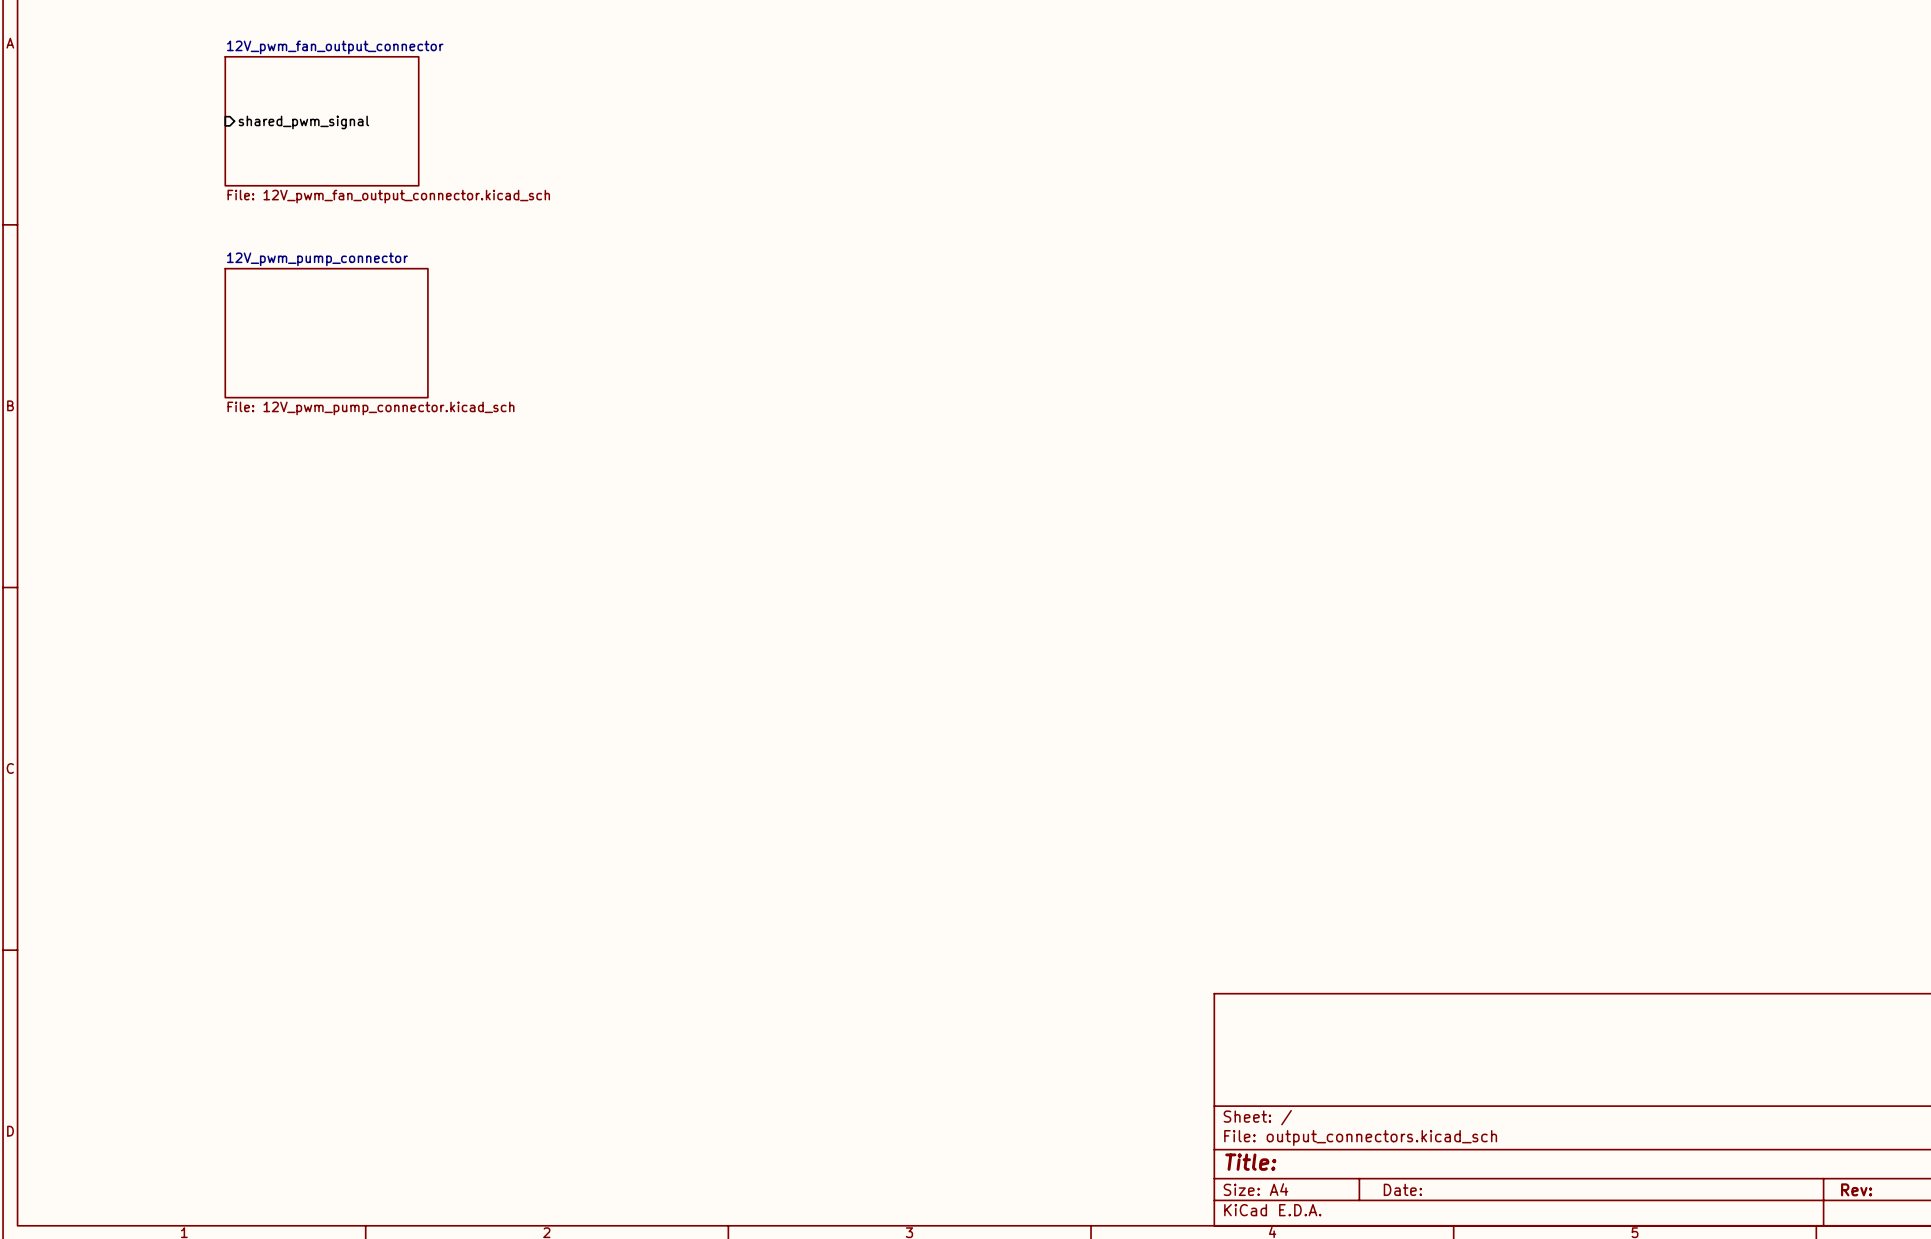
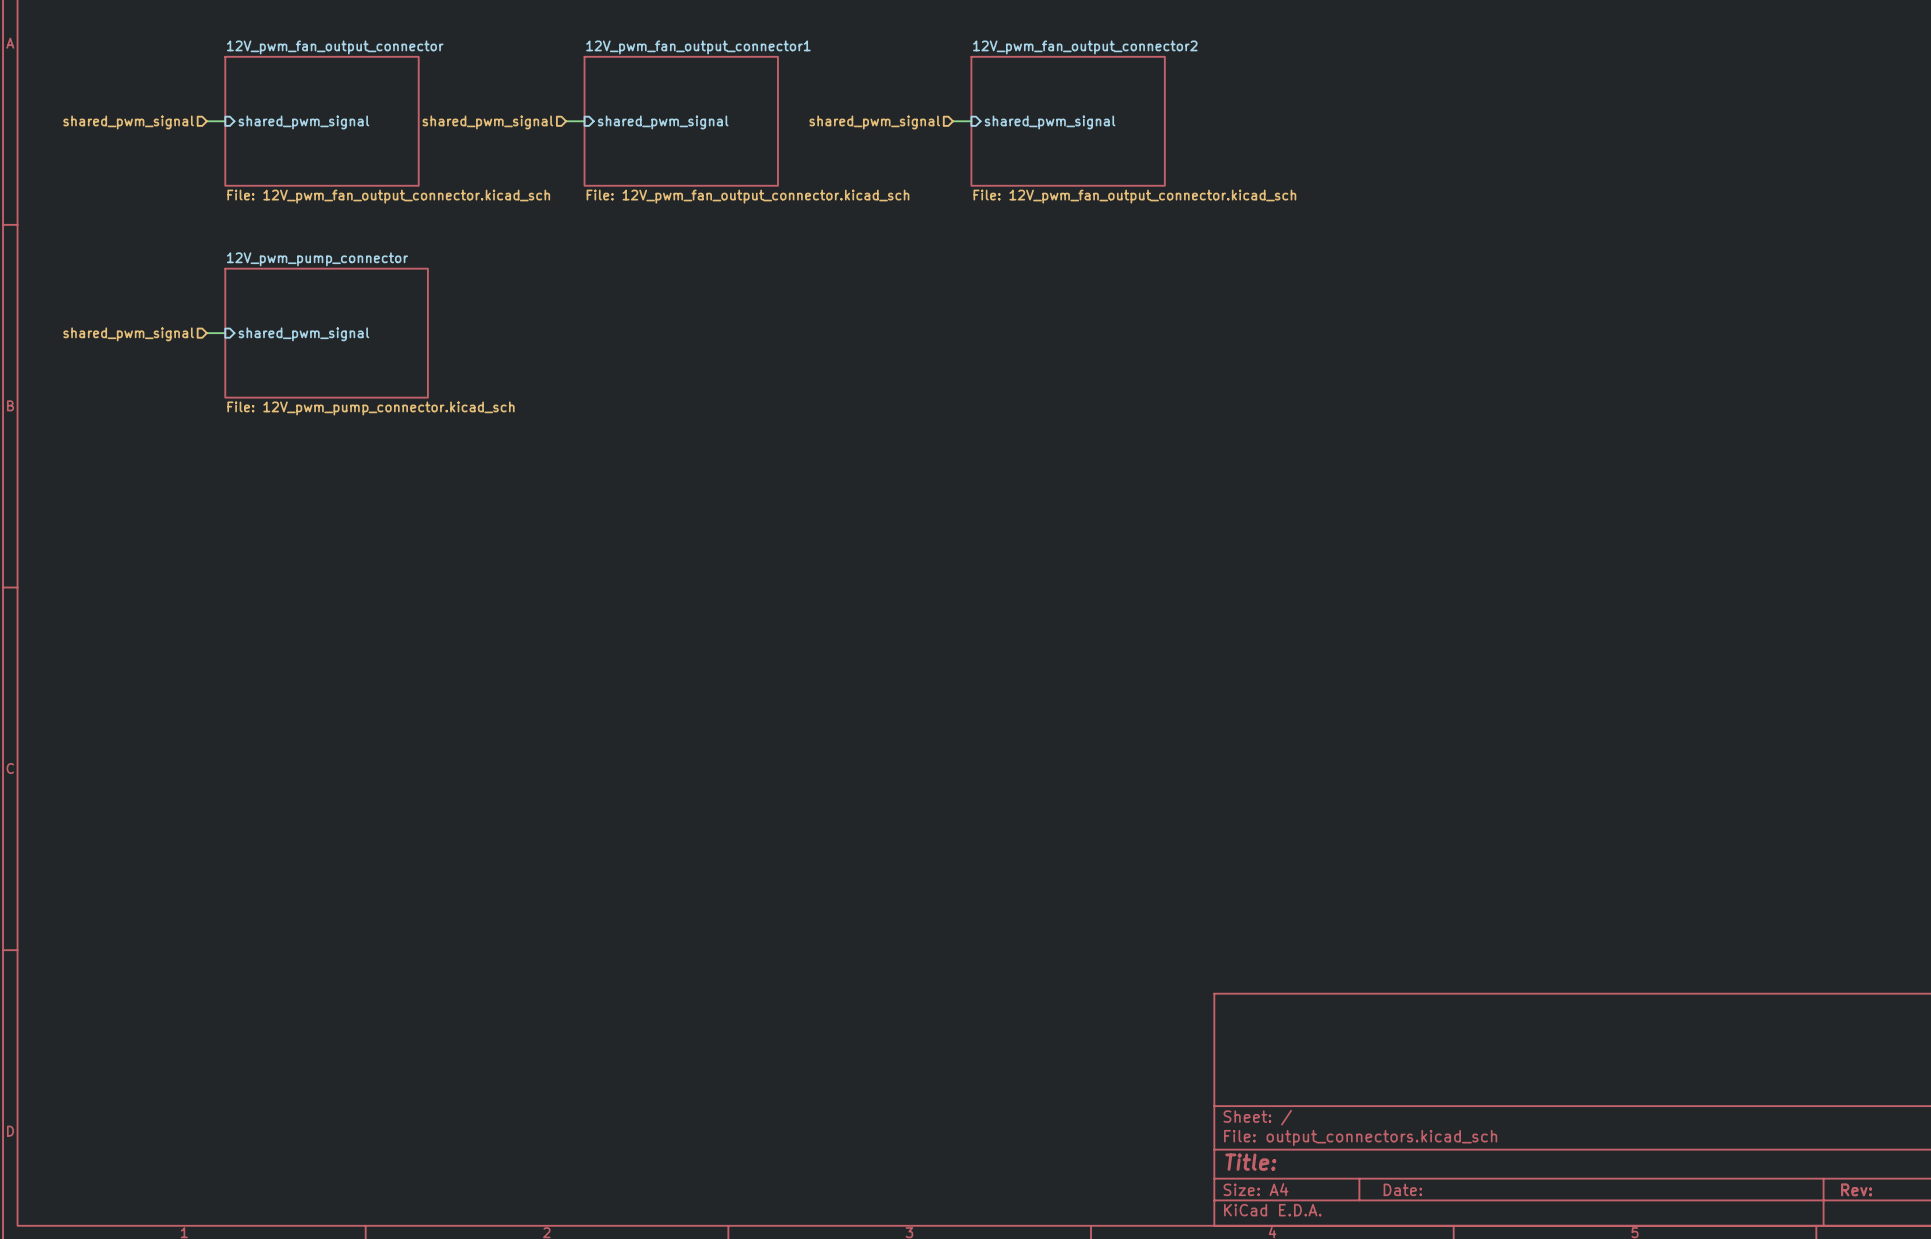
wire: none -> (206, 121) (225, 121)
wire: none -> (566, 121) (584, 121)
sheet 12V_pwm_fan_output_connector1: none -> File: 12V_pwm_fan_output_connector.kicad_sch (681, 121)
wire: none -> (952, 121) (971, 121)
sheet 12V_pwm_fan_output_connector2: none -> File: 12V_pwm_fan_output_connector.kicad_sch (1068, 121)
hierarchical label: none -> shared_pwm_signal (128, 122)
hierarchical label: none -> shared_pwm_signal (487, 122)
sheet pin: none -> shared_pwm_signal (663, 122)
hierarchical label: none -> shared_pwm_signal (874, 122)
sheet pin: none -> shared_pwm_signal (1050, 122)
wire: none -> (206, 333) (225, 333)
hierarchical label: none -> shared_pwm_signal (128, 334)
sheet pin: none -> shared_pwm_signal (303, 334)

